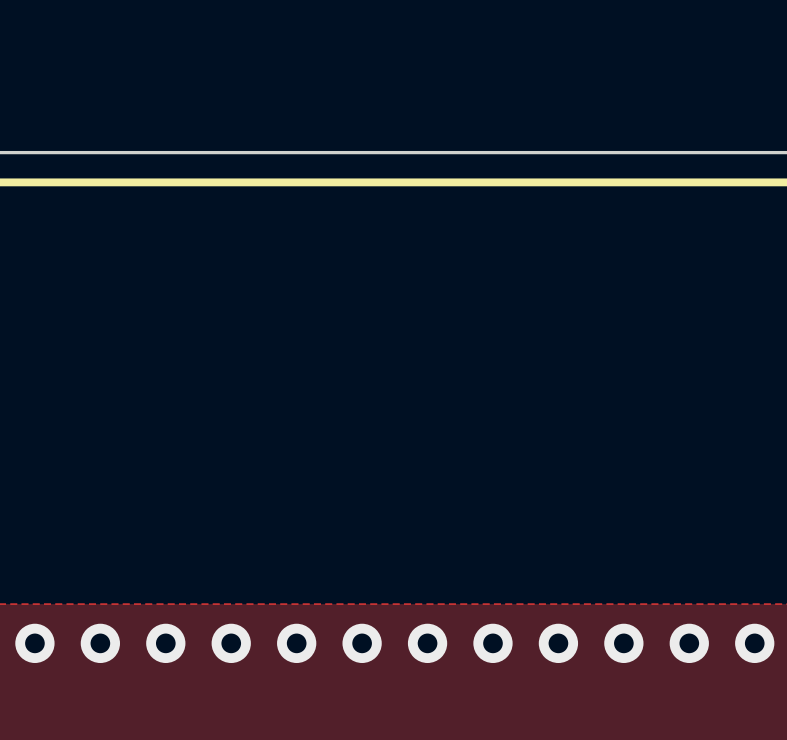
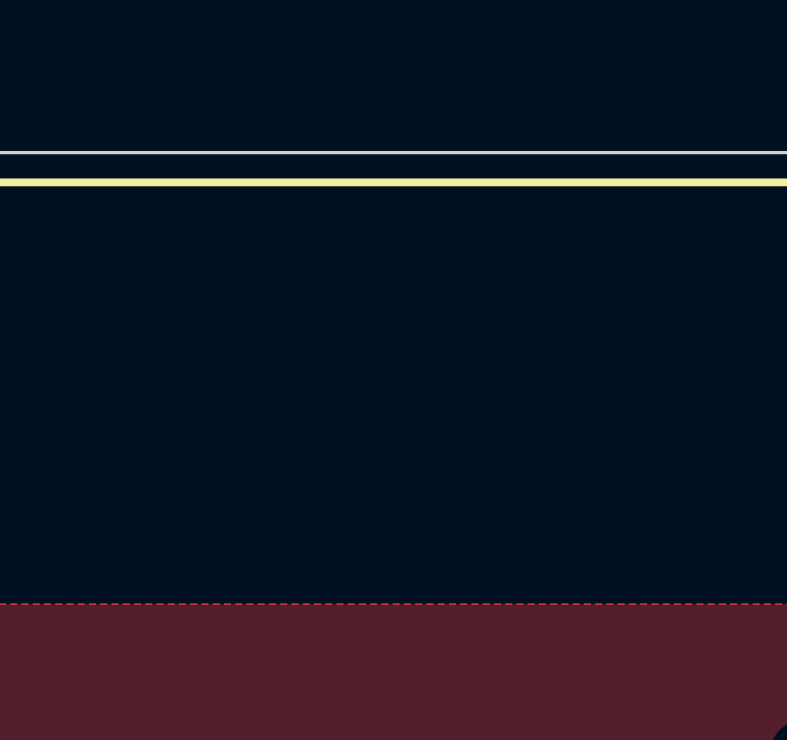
via: (34, 643) -> none
via: (100, 643) -> none
via: (165, 643) -> none
via: (231, 643) -> none
via: (296, 643) -> none
via: (362, 643) -> none
via: (427, 643) -> none
via: (492, 643) -> none
via: (558, 643) -> none
via: (623, 643) -> none
via: (689, 643) -> none
via: (754, 643) -> none

